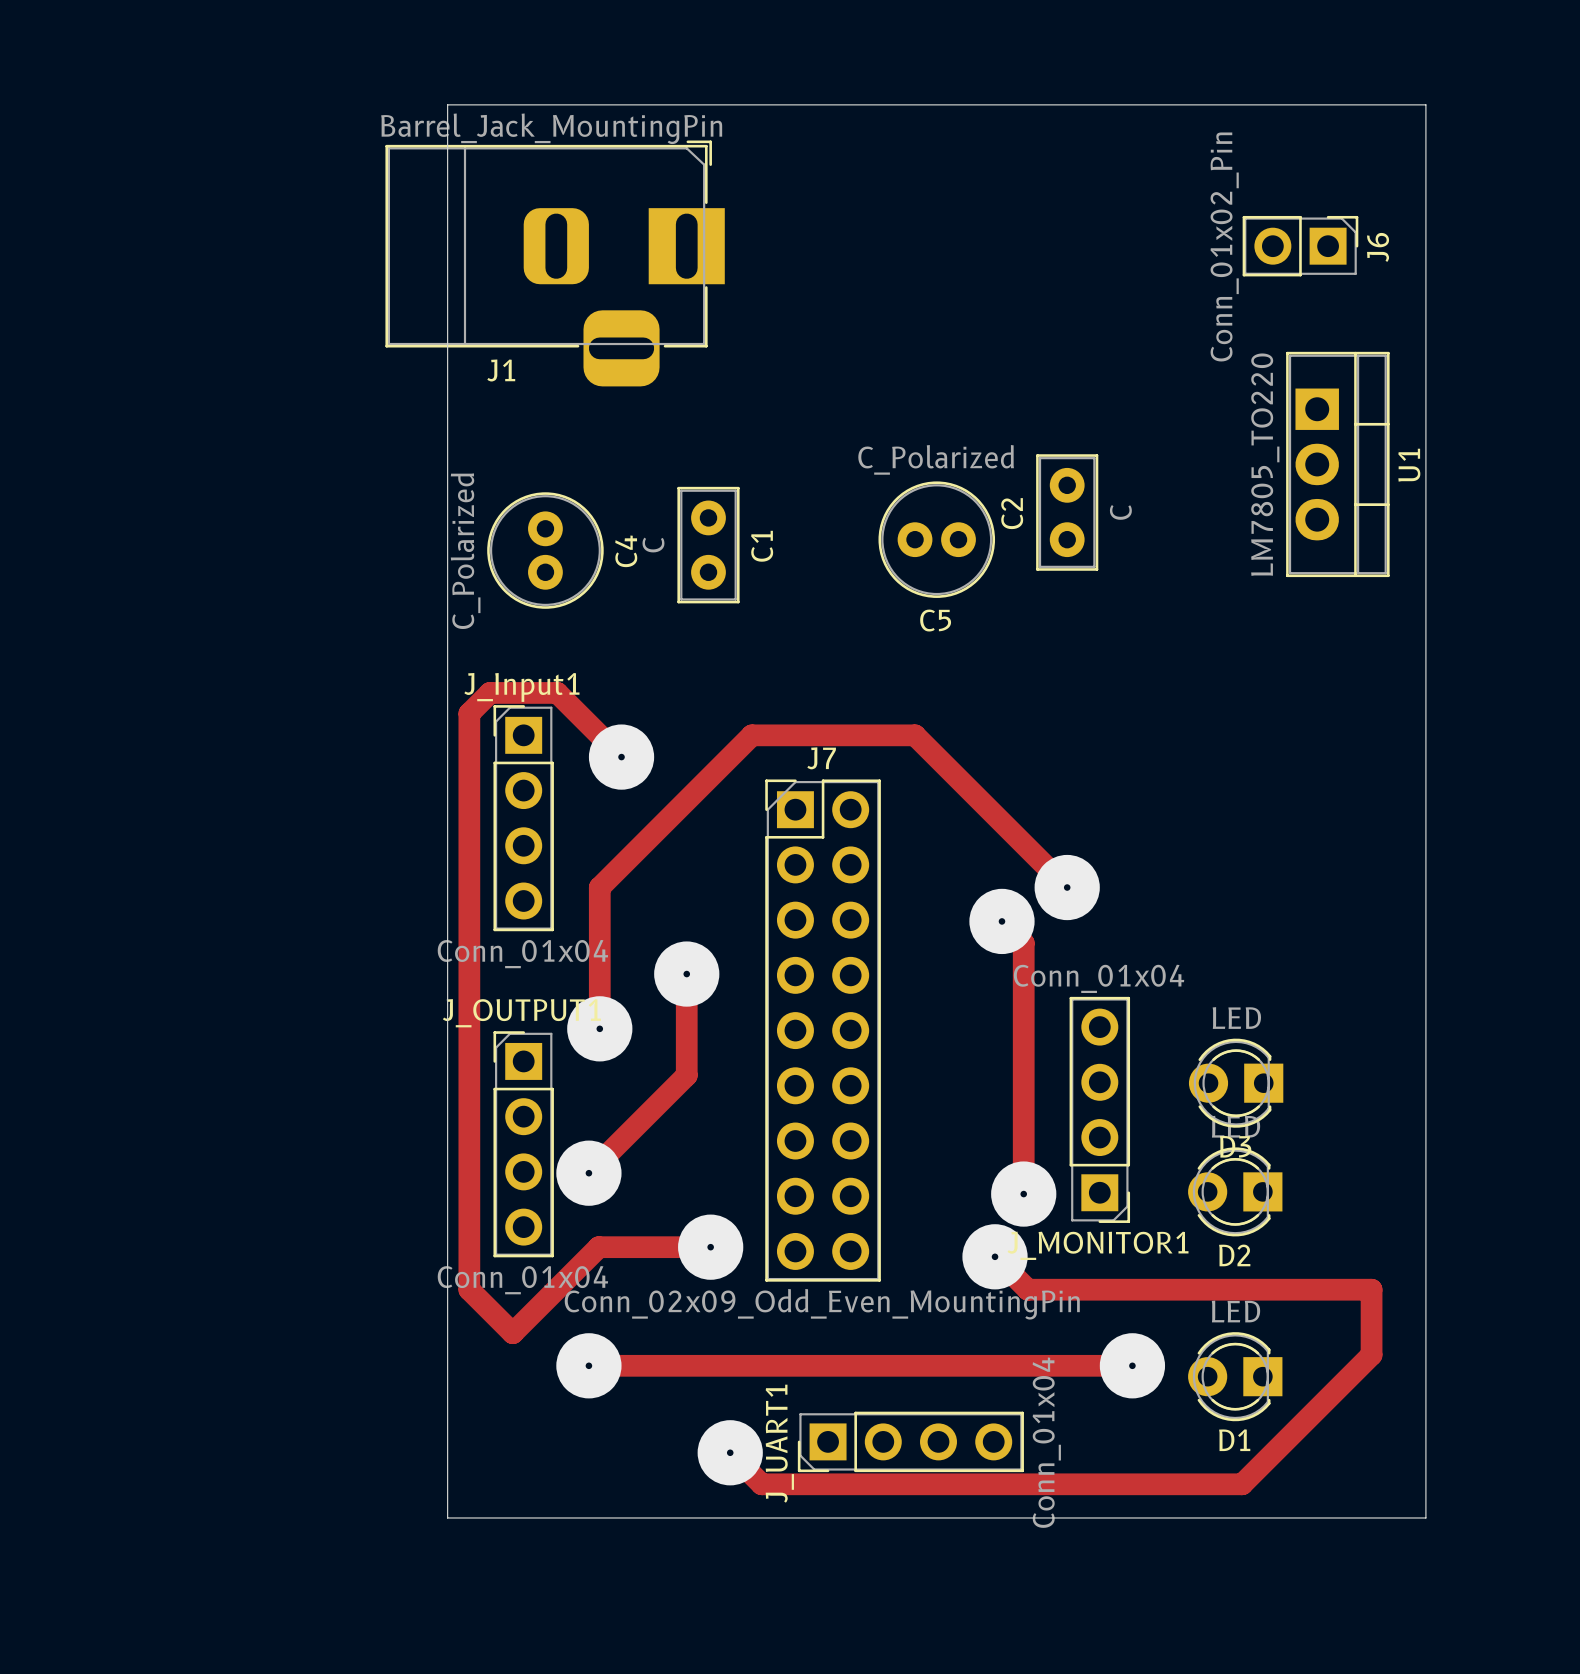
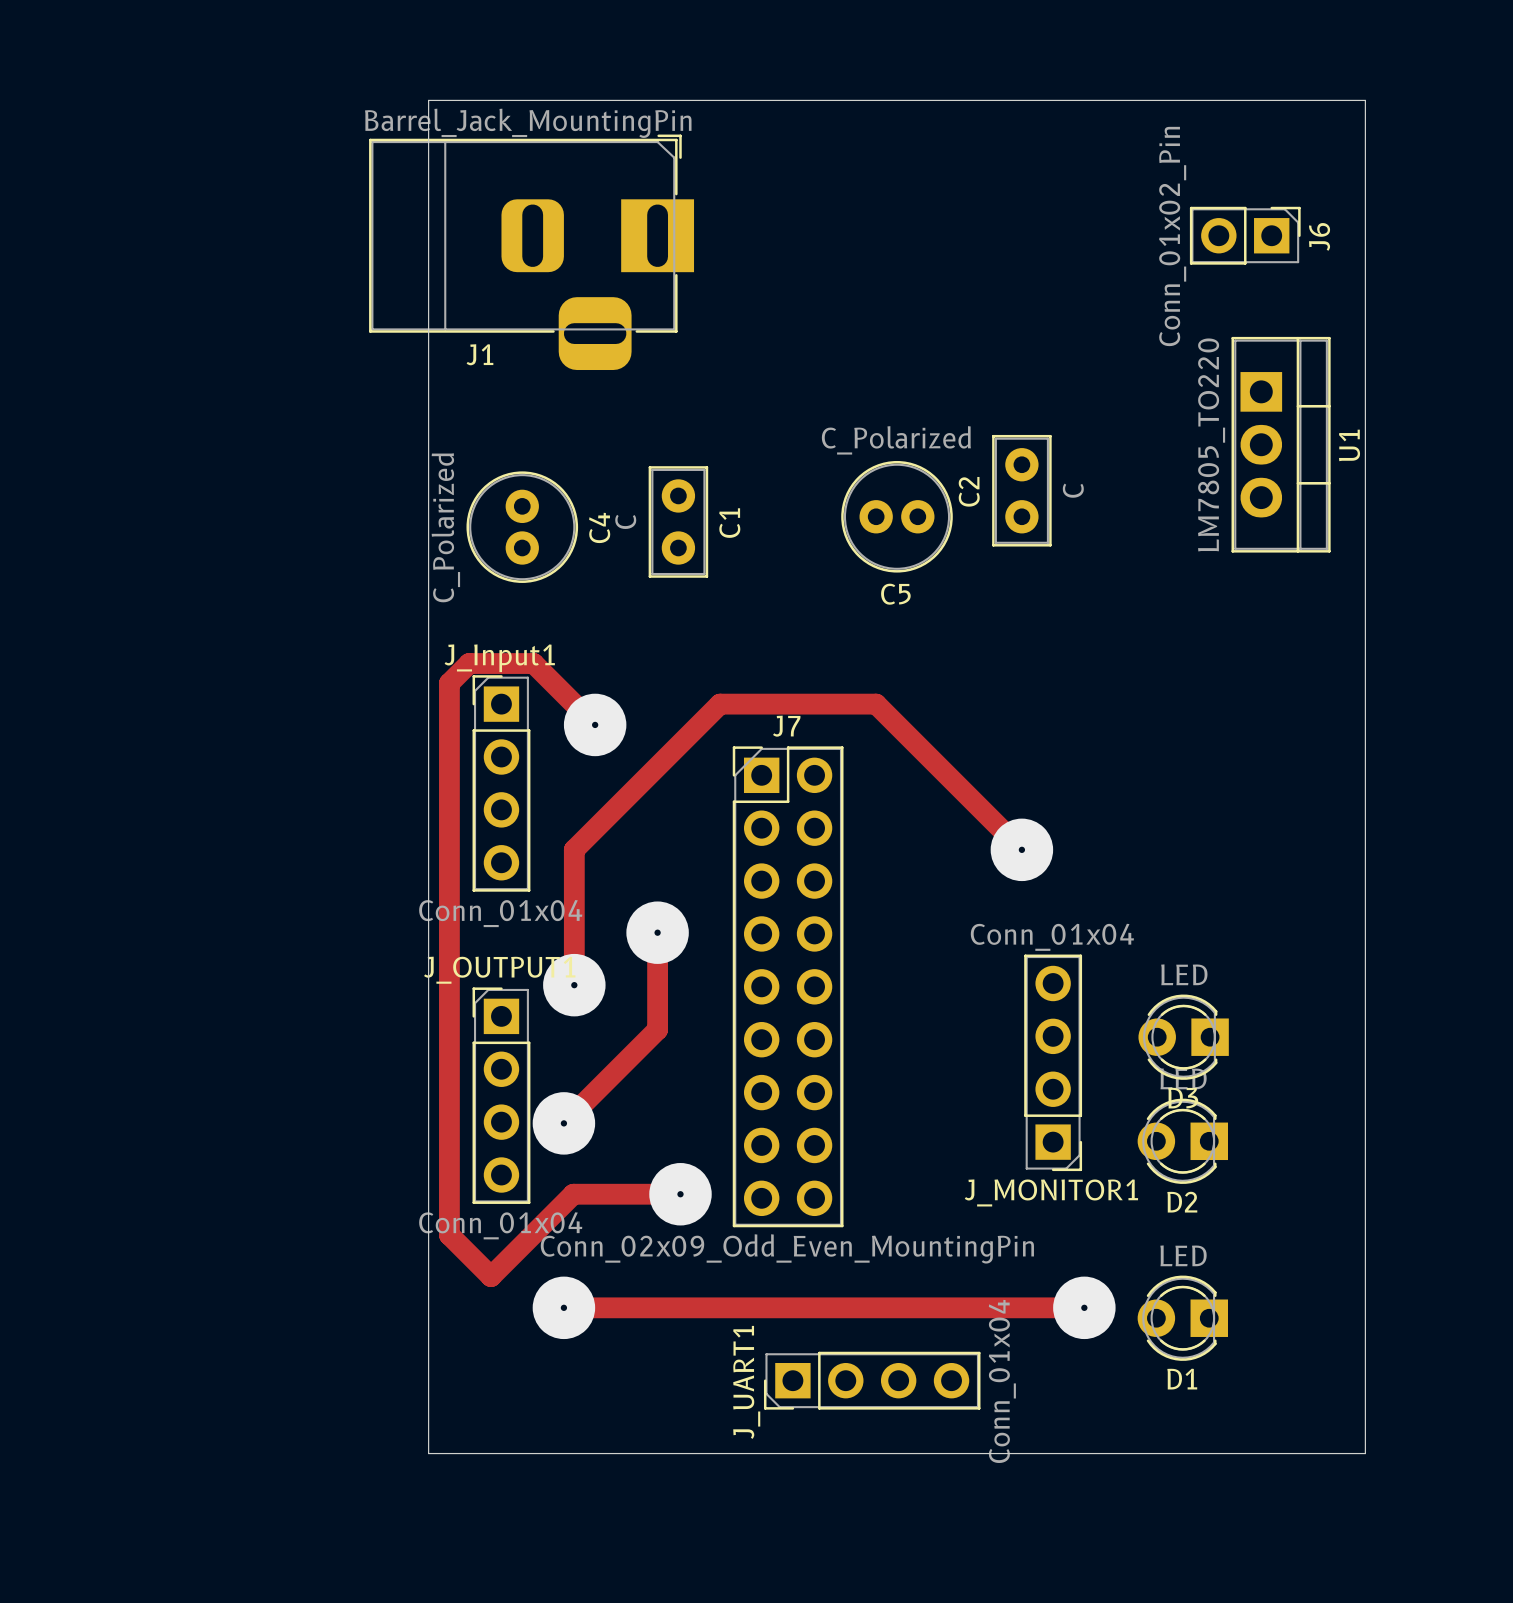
track: (1001, 921) (1023, 943) (1023, 1194) -> none
via: (1001, 921) -> none
via: (1023, 1194) -> none
track: (995, 1256) (1027, 1289) (1371, 1289) (1371, 1354) (1242, 1484) (761, 1484) (730, 1452) -> none
via: (995, 1256) -> none
via: (730, 1452) -> none

